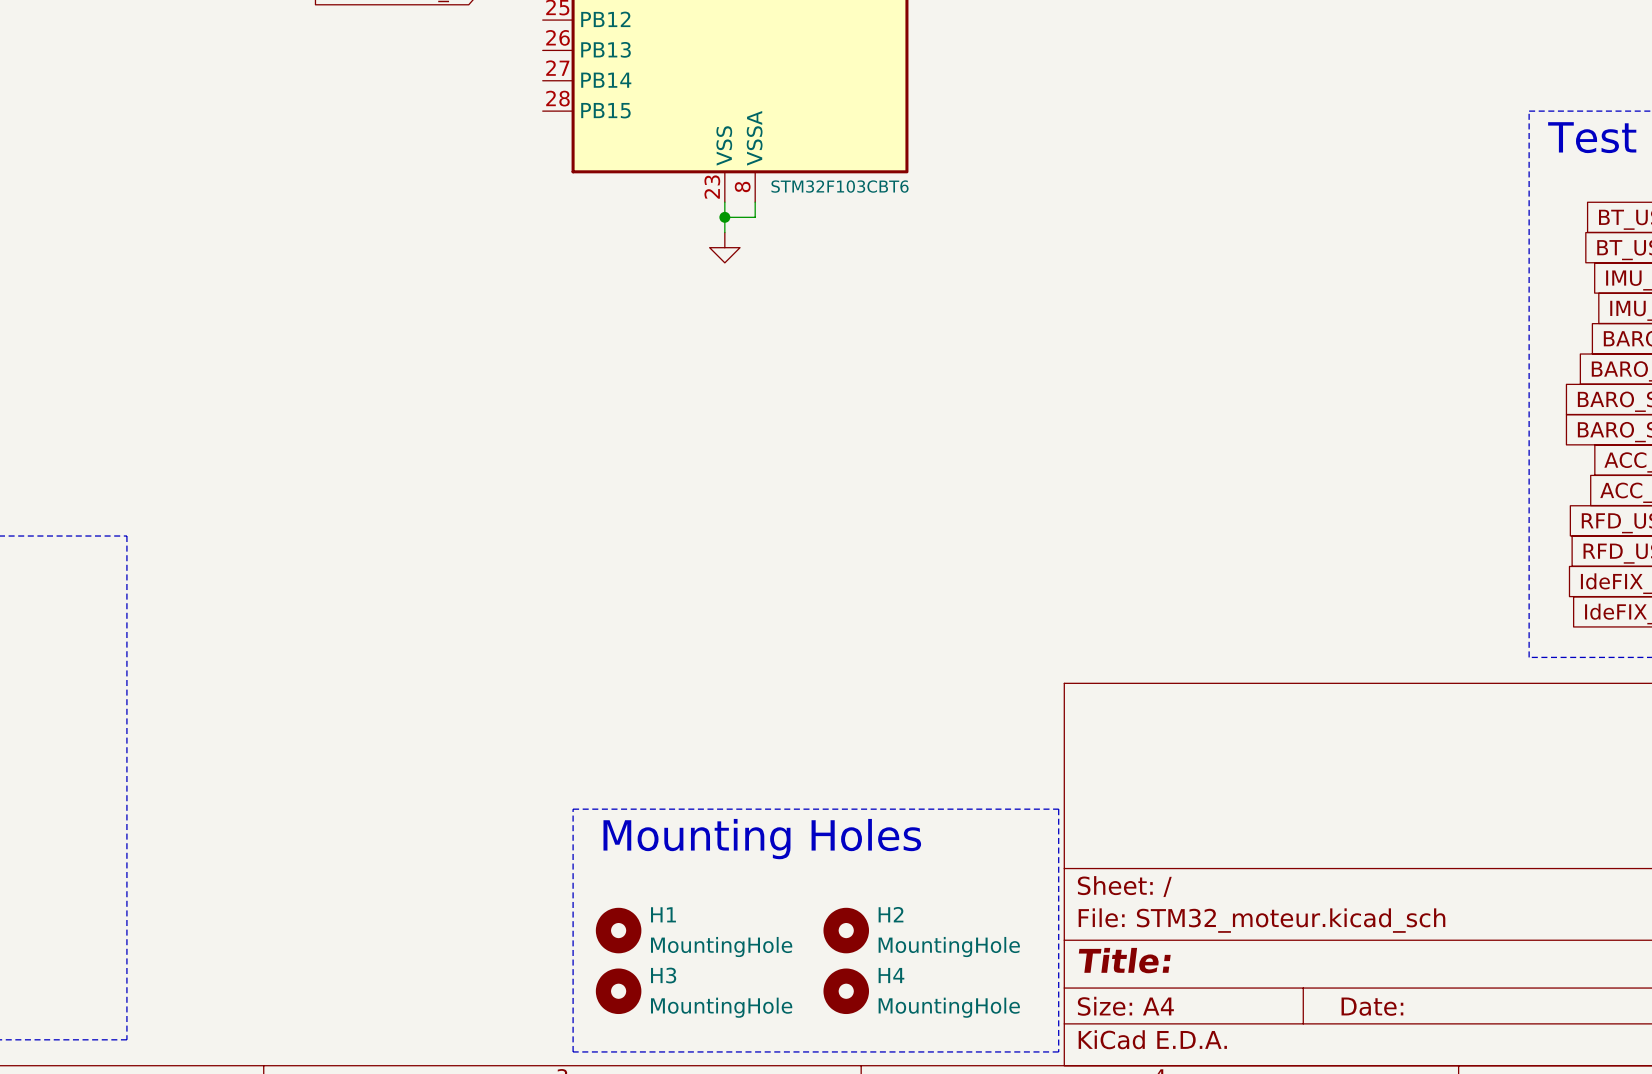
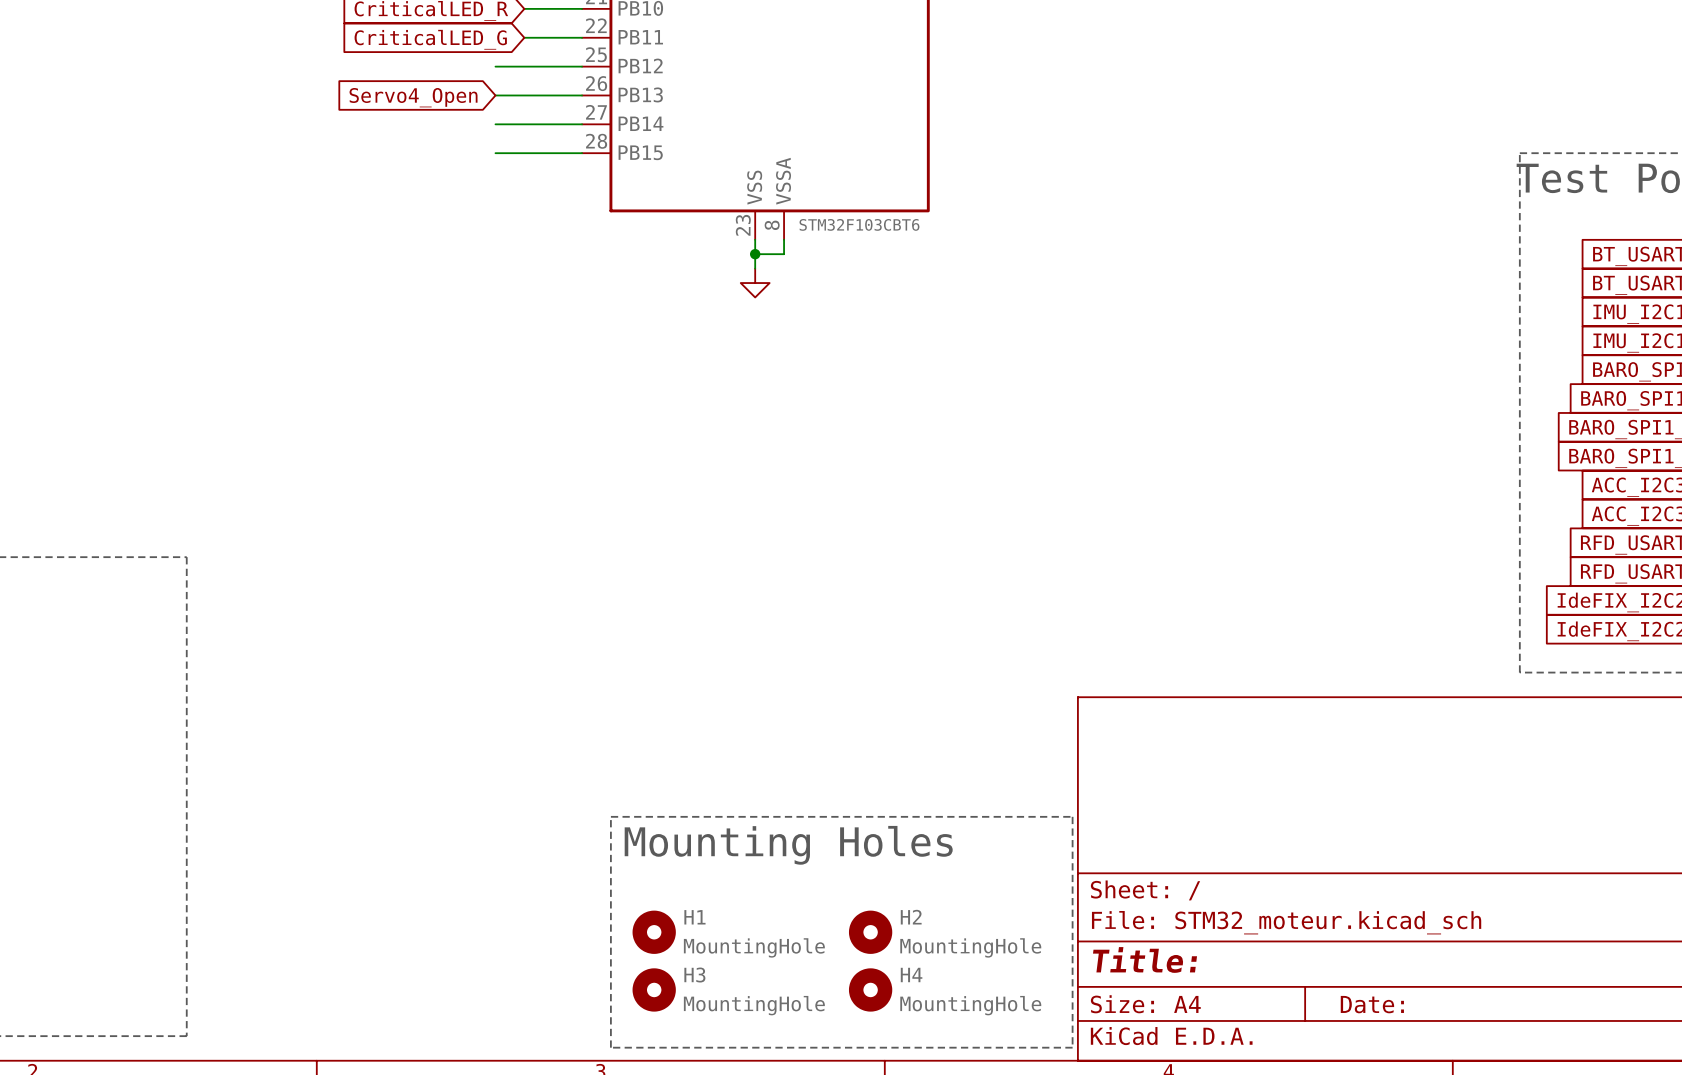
wire: none -> (495, 66) (582, 66)
wire: none -> (495, 95) (582, 95)
global label: none -> Servo4_Open (413, 97)
wire: none -> (495, 124) (582, 124)
wire: none -> (495, 153) (582, 153)

